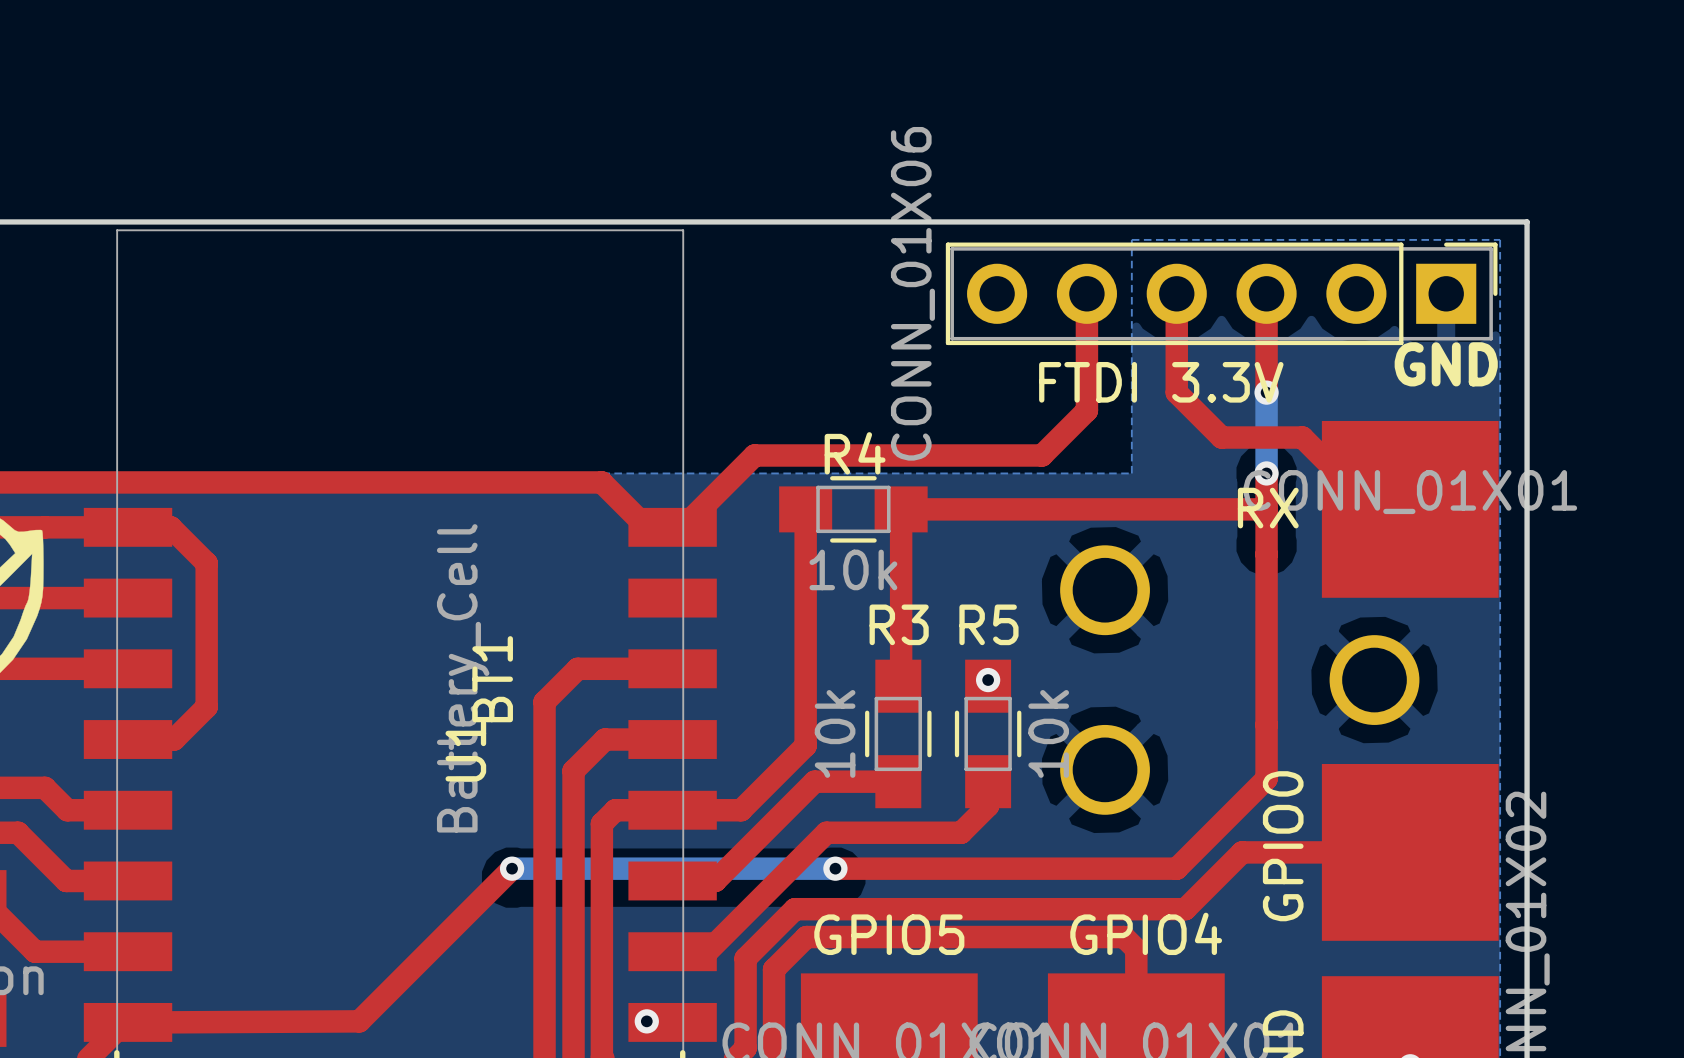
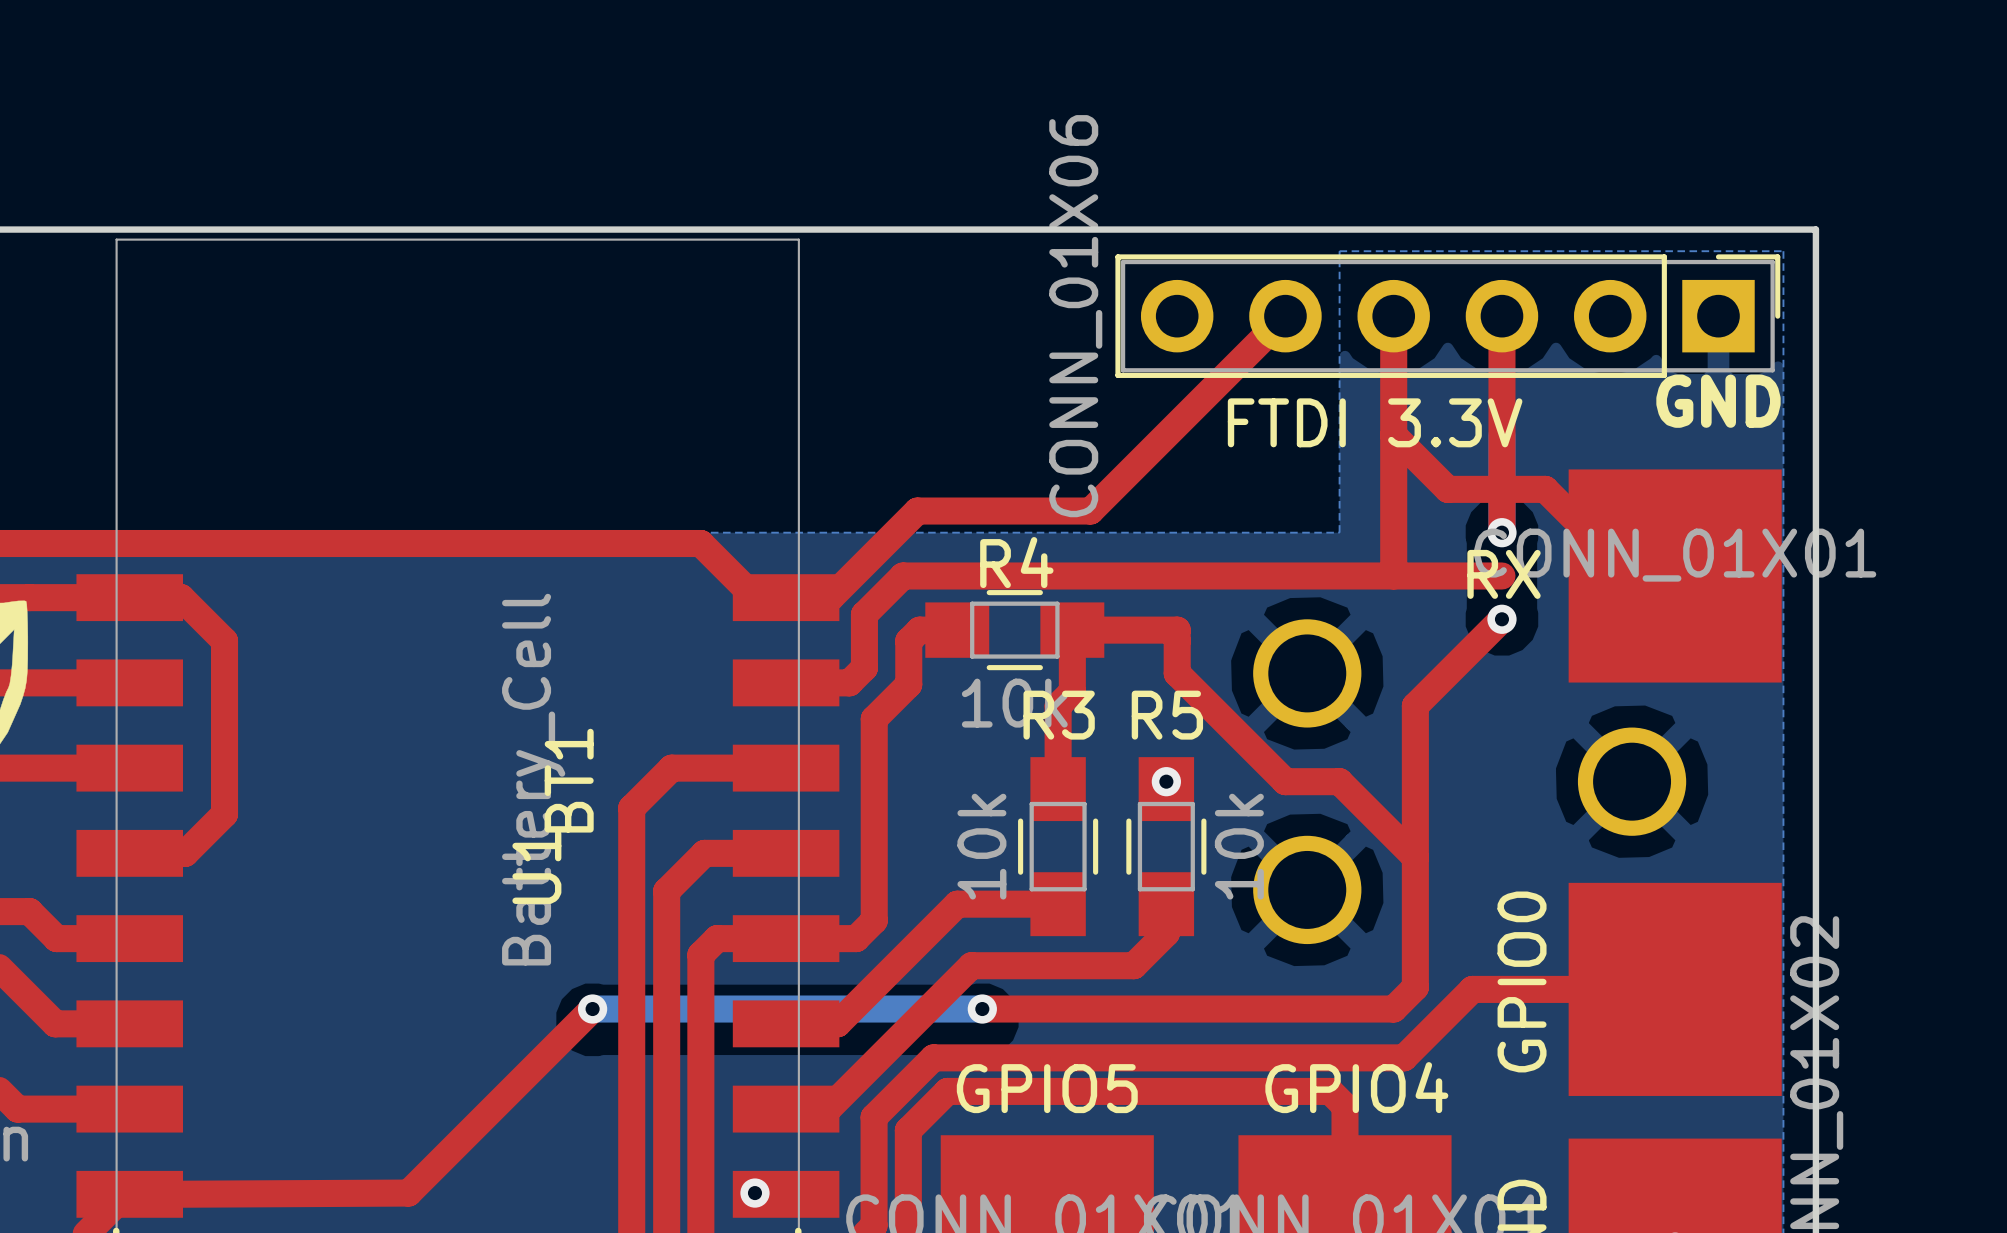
top track: (1086, 293) (1086, 410) (1042, 455) (925, 455) -> (1285, 316) (1090, 511)
top track: none -> (1393, 435) (1393, 575)
top track: none -> (1501, 435) (1501, 532)
via position: (1266, 392) -> (1501, 619)
top track: (781, 455) (754, 455) (682, 527) -> (917, 511) (830, 597) (798, 597)
top track: (1266, 473) (1266, 778) (1194, 850) -> (1501, 619) (1415, 705) (1415, 987)
top track: (805, 509) (805, 745) (741, 810) (730, 810) -> (957, 630) (919, 630) (908, 641) (908, 684) (874, 719) (874, 920) (856, 938)
R4 position: (853, 509) -> (1014, 630)
top track: (901, 509) (901, 683) (898, 686) -> (1061, 575) (903, 575) (864, 614) (864, 667) (849, 682) (756, 682)
top track: none -> (1058, 789) (1058, 705) (1072, 691) (1072, 630) (1177, 630) (1177, 673) (1285, 781) (1339, 781) (1415, 857)

